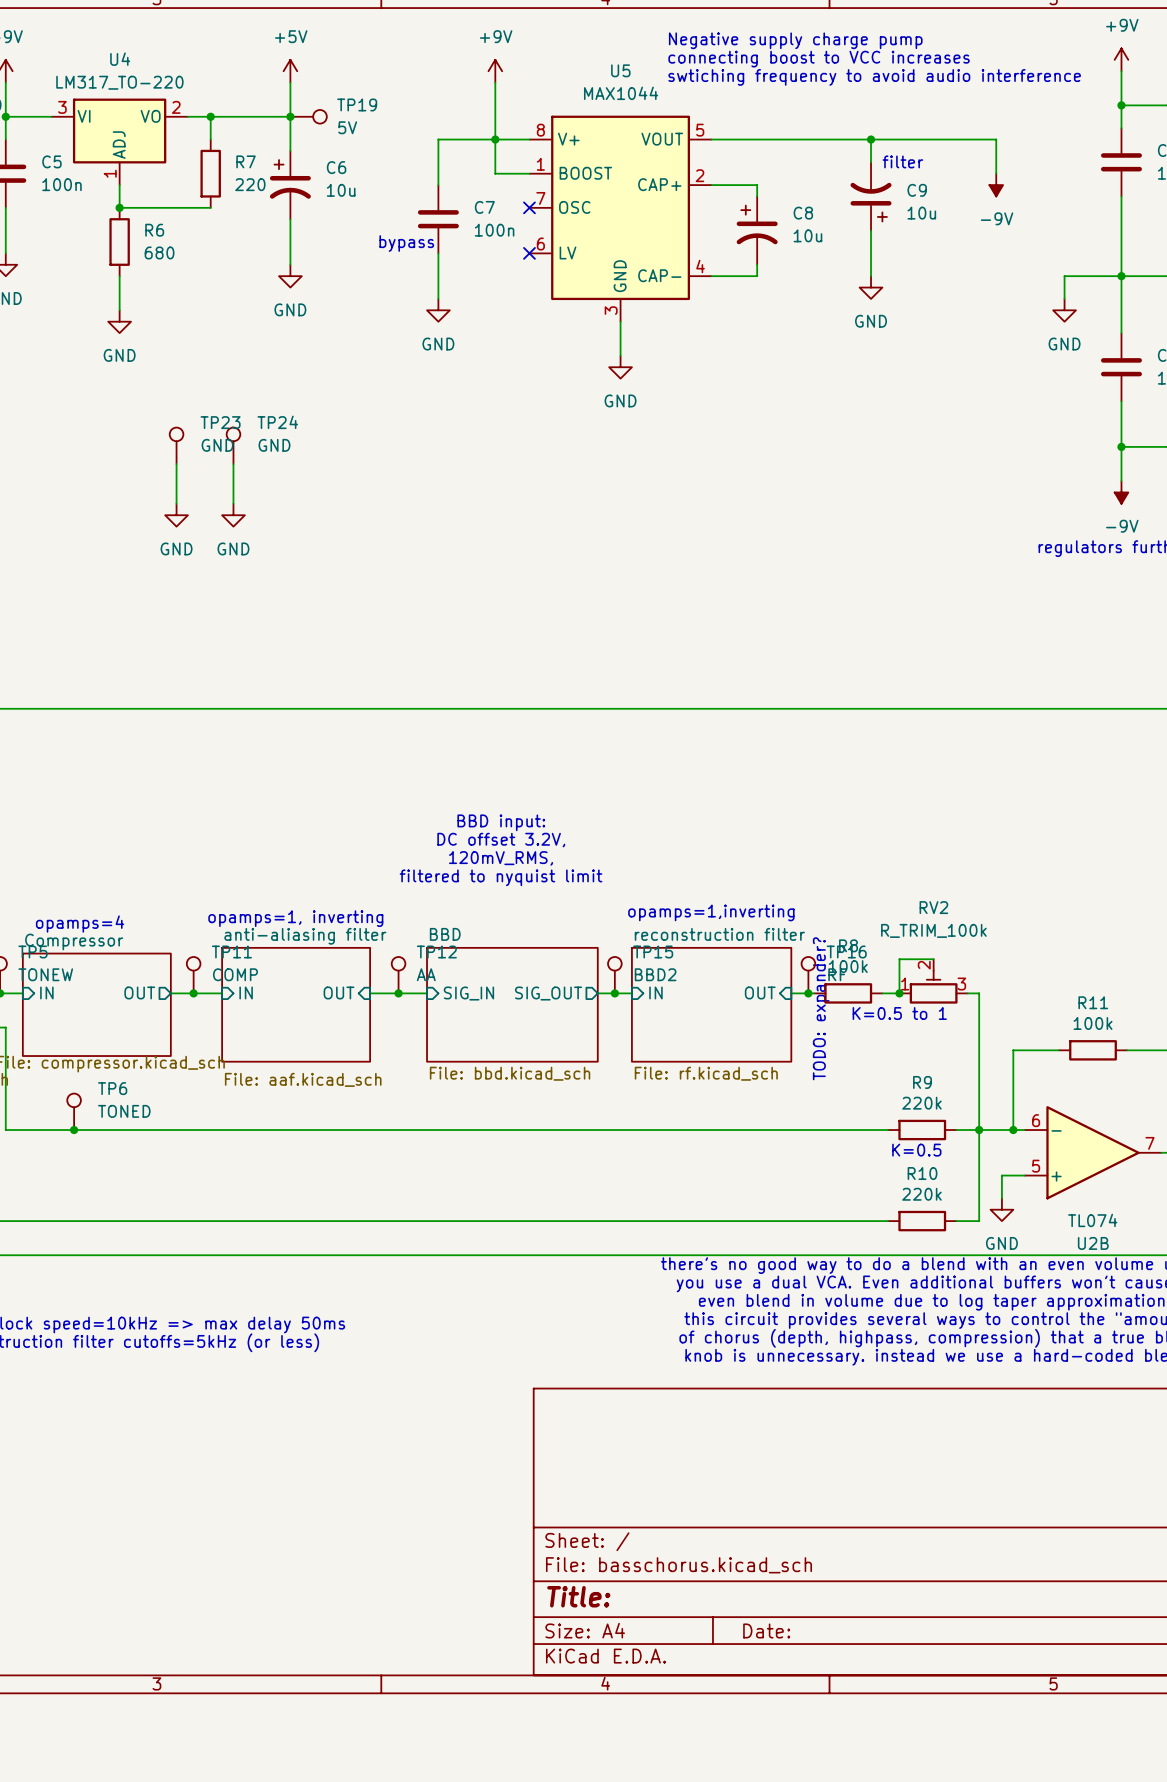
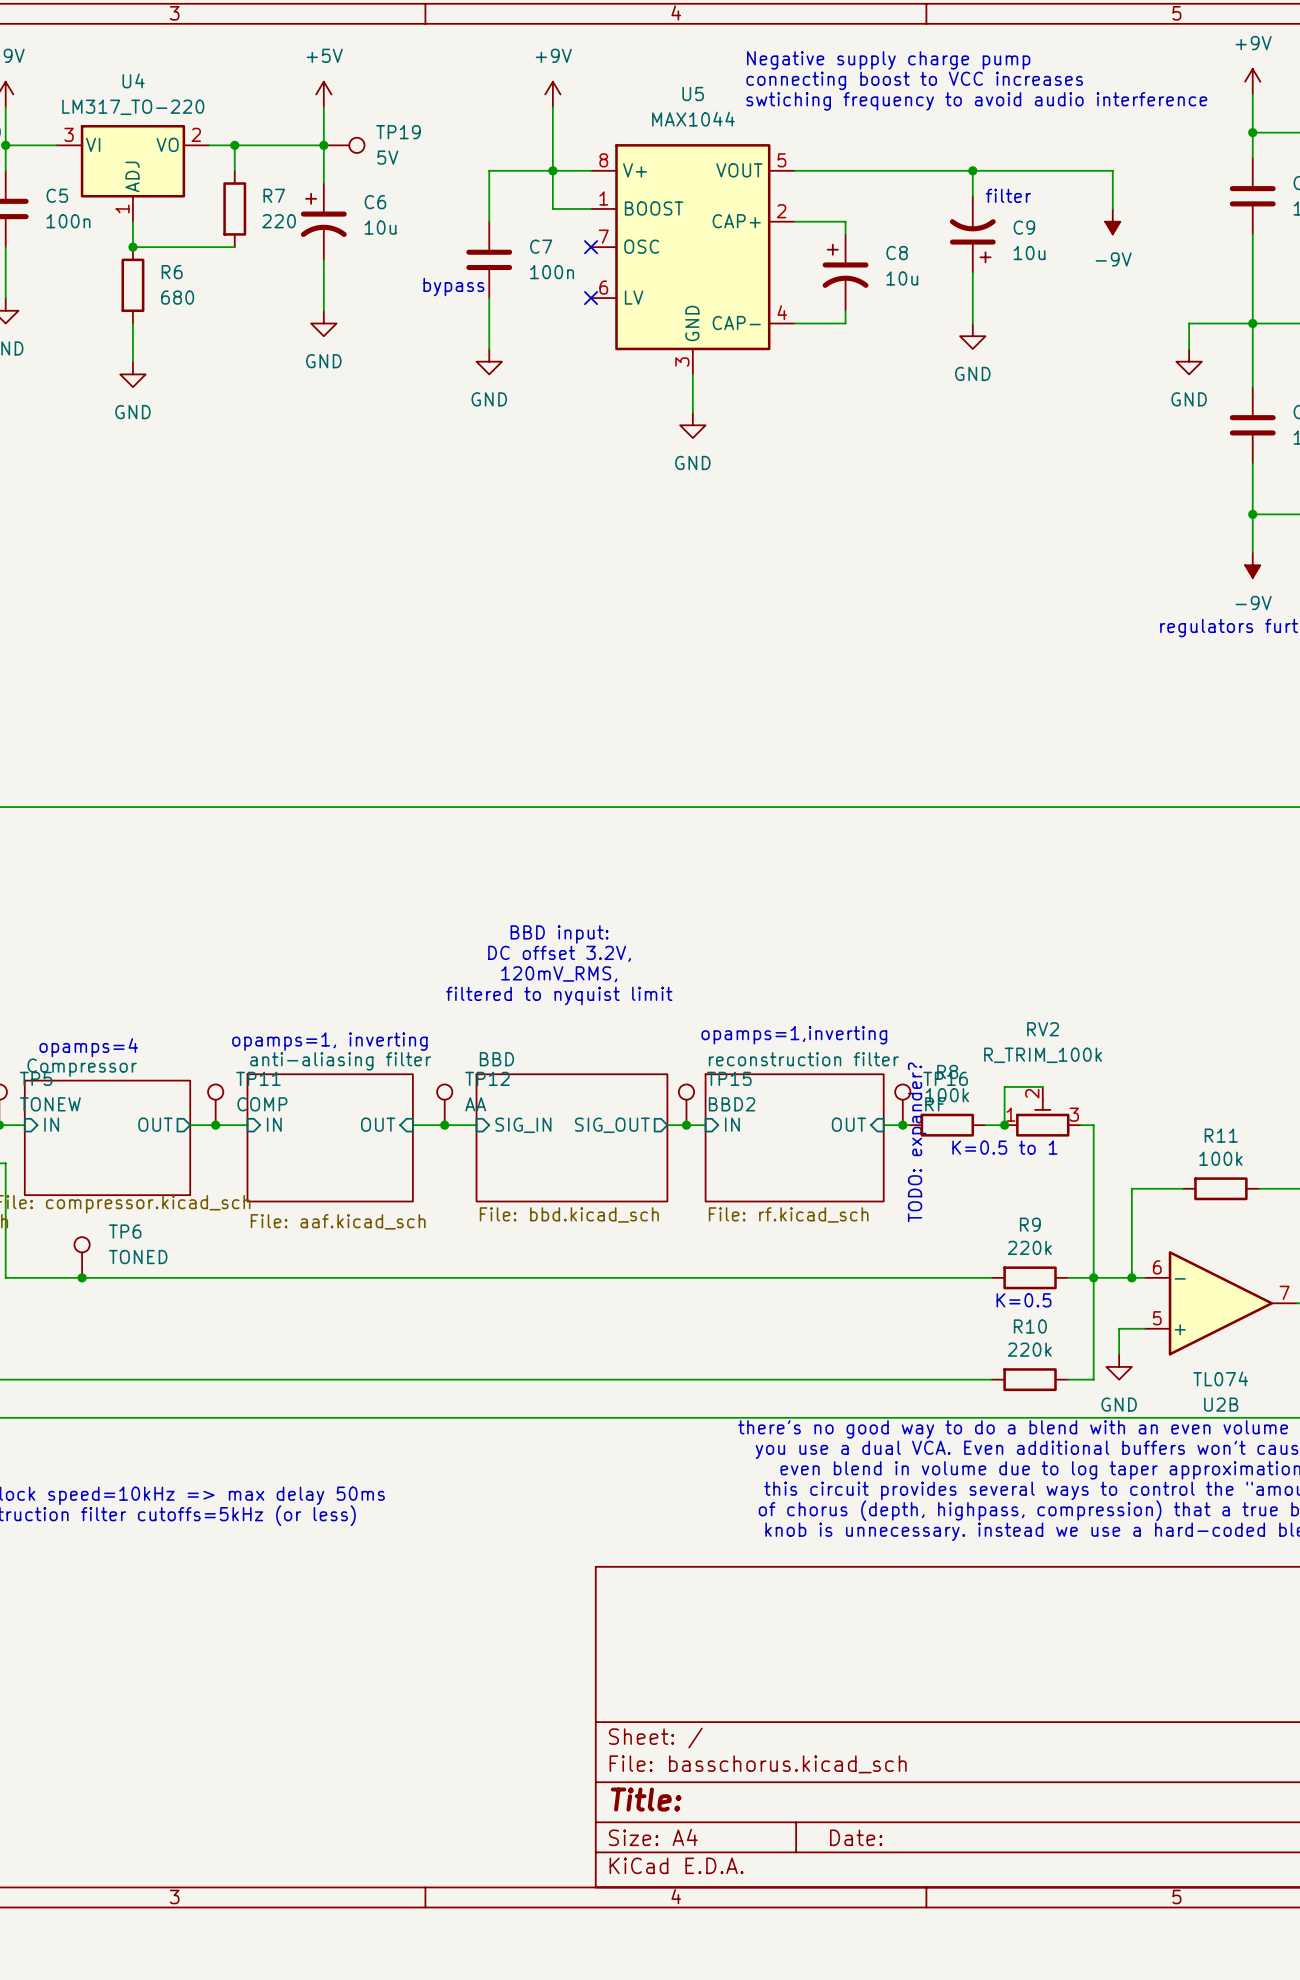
TP23: GND (176, 445) -> none
TP24: GND (233, 445) -> none
wire: (176, 464) (176, 503) -> none
wire: (233, 464) (233, 503) -> none
power symbol: GND (176, 515) -> none
power symbol: GND (233, 515) -> none

